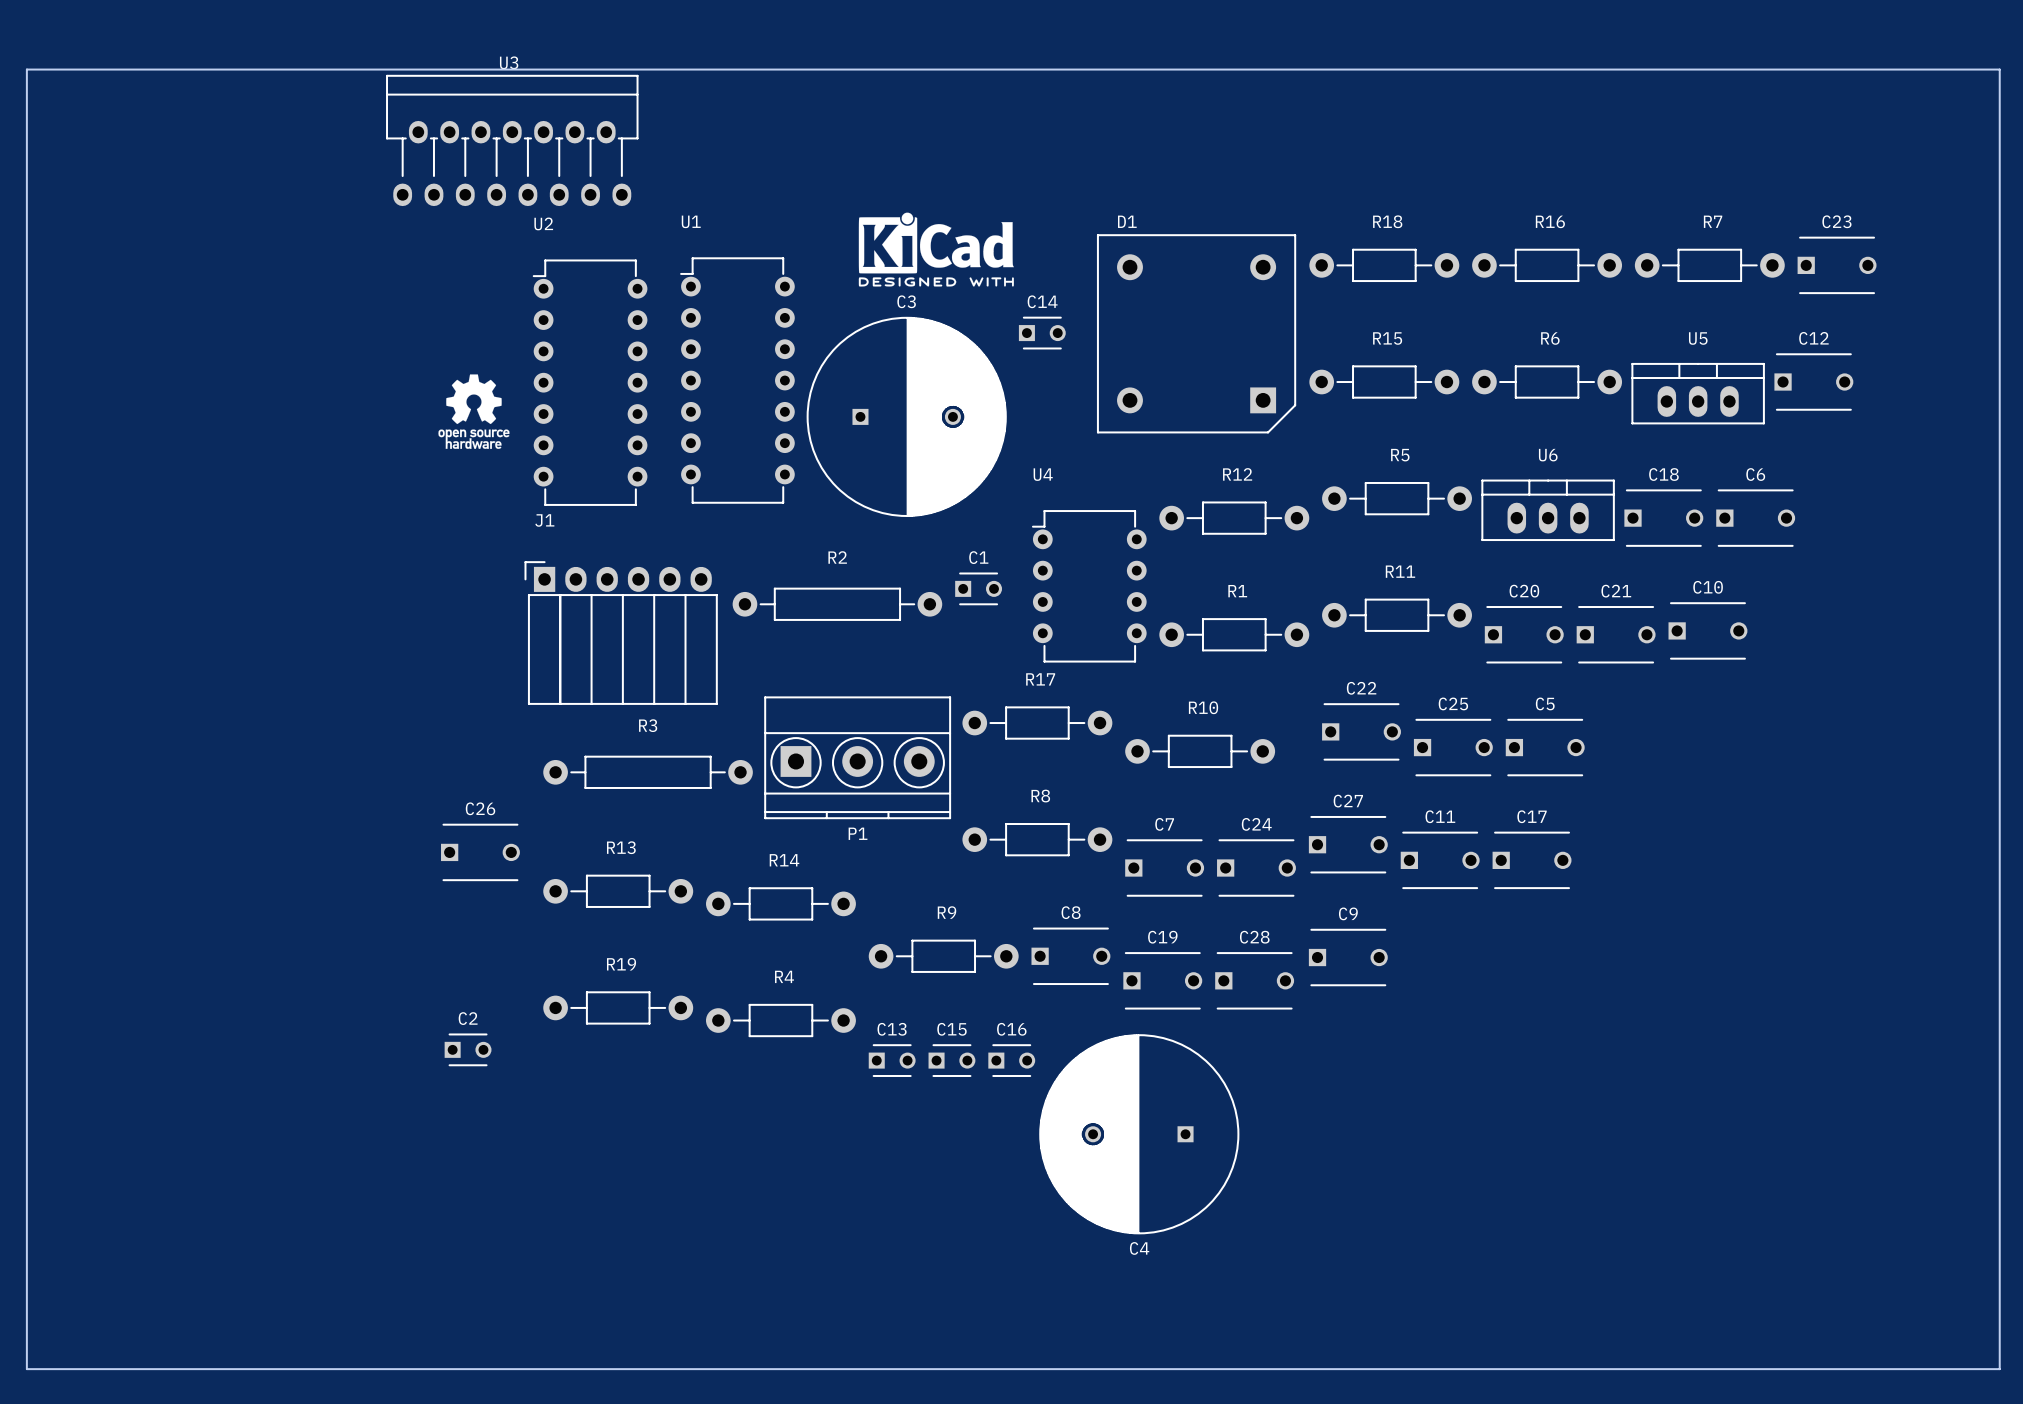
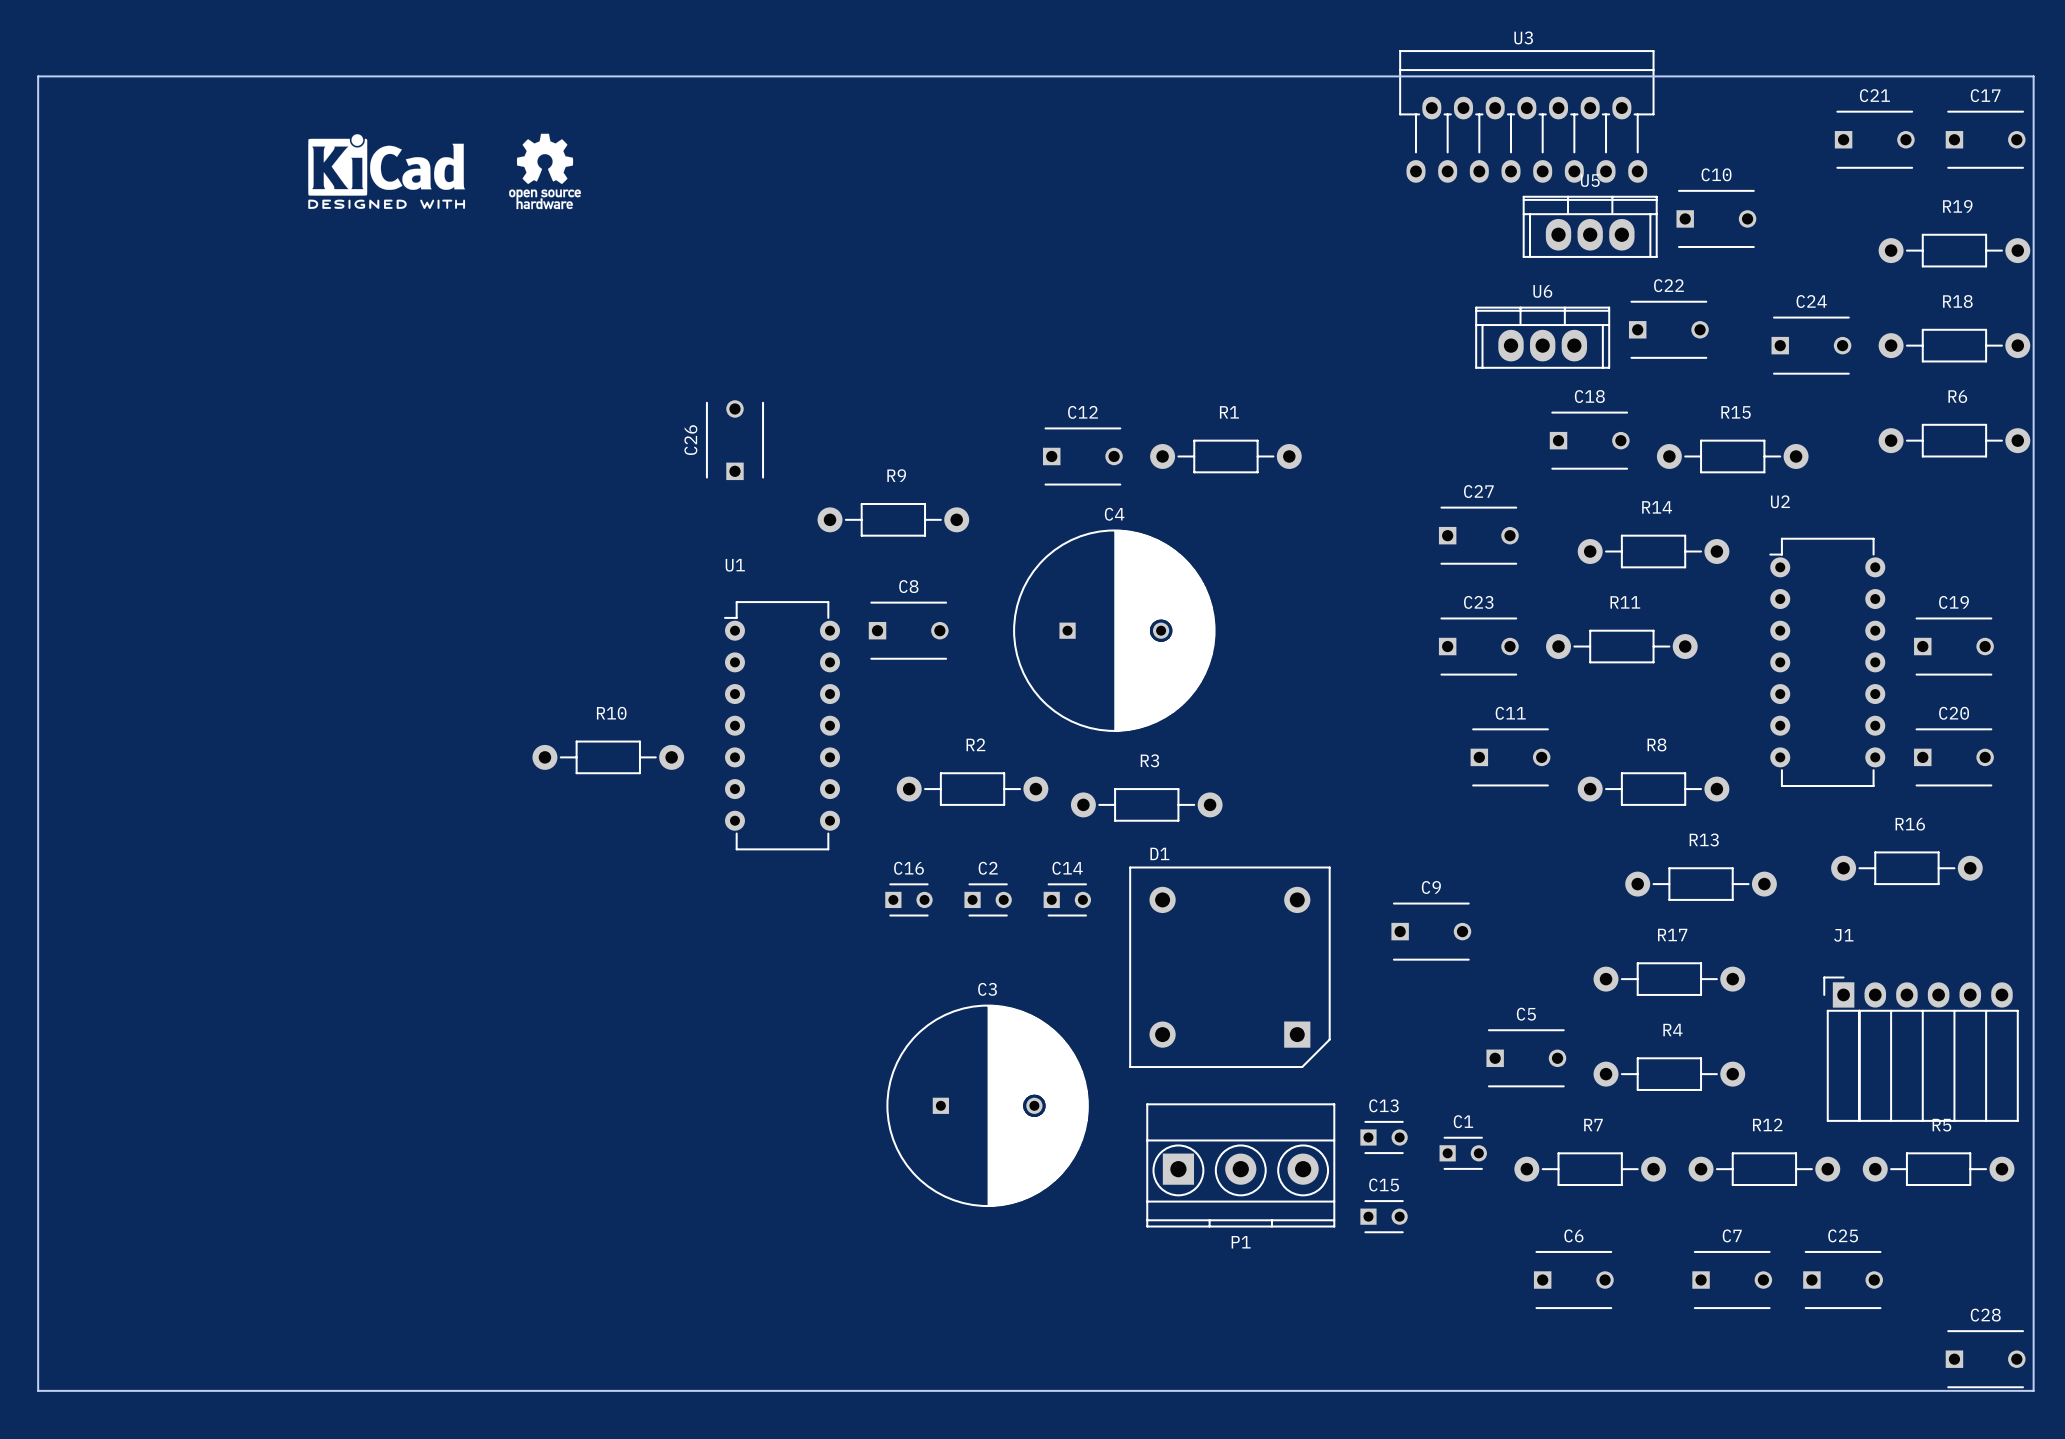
drawing: none -> [308, 134, 466, 209]
U3 position: (512, 140) -> (1526, 116)
drawing: [858, 212, 1014, 287] -> none
R18 position: (1384, 265) -> (1954, 345)
R16 position: (1547, 265) -> (1906, 868)
R7 position: (1709, 265) -> (1590, 1169)
C23 position: (1837, 265) -> (1478, 646)
C14 position: (1042, 333) -> (1067, 899)
D1 position: (1196, 333) -> (1229, 967)
U5 footprint: [1631, 362, 1765, 425] -> [1522, 195, 1658, 258]
U1 position: (737, 380) -> (782, 725)
U2 position: (590, 382) -> (1827, 662)
R15 position: (1384, 382) -> (1732, 456)
R6 position: (1547, 382) -> (1954, 440)
C12 position: (1813, 382) -> (1082, 456)
drawing position: (473, 411) -> (545, 171)
C3 position: (906, 416) -> (987, 1105)
U6 footprint: [1481, 479, 1615, 541] -> [1475, 306, 1611, 369]
R5 position: (1397, 498) -> (1938, 1169)
R12 position: (1234, 518) -> (1764, 1169)
C18 position: (1663, 518) -> (1589, 440)
C6 position: (1755, 518) -> (1573, 1280)
U4: (1089, 586) -> none
R2 footprint: [732, 587, 943, 621] -> [896, 772, 1049, 806]
C1 position: (978, 588) -> (1463, 1153)
R11 position: (1397, 615) -> (1621, 646)
C10 position: (1707, 630) -> (1716, 218)
J1 position: (621, 633) -> (1921, 1049)
R1 position: (1234, 634) -> (1225, 456)
C20 position: (1524, 634) -> (1953, 757)
C21 position: (1616, 634) -> (1874, 139)
R17 position: (1037, 723) -> (1669, 979)
C22 position: (1361, 731) -> (1668, 329)
C25 position: (1453, 747) -> (1843, 1280)
C5 position: (1545, 747) -> (1526, 1058)
R10 position: (1200, 751) -> (608, 757)
R3 footprint: [543, 755, 753, 789] -> [1070, 788, 1223, 822]
P1 position: (857, 757) -> (1240, 1165)
R8 position: (1037, 839) -> (1653, 789)
C27 position: (1348, 844) -> (1478, 535)
C26 rotation: 0° (480, 852) -> 90° counterclockwise (734, 440)
C26 position: (480, 852) -> (734, 440)
C11 position: (1440, 860) -> (1510, 757)
C17 position: (1532, 860) -> (1985, 139)
C7 position: (1164, 868) -> (1732, 1280)
C24 position: (1256, 868) -> (1811, 345)
R13 position: (618, 891) -> (1701, 884)
R14 position: (780, 903) -> (1653, 551)
R9 position: (943, 956) -> (893, 519)
C8 position: (1070, 956) -> (908, 630)
C9 position: (1348, 957) -> (1431, 931)
C19 position: (1162, 980) -> (1953, 646)
C28 position: (1254, 980) -> (1985, 1359)
R19 position: (618, 1007) -> (1954, 250)
R4 position: (780, 1020) -> (1669, 1074)
C2 position: (468, 1049) -> (988, 899)
C13 position: (892, 1060) -> (1384, 1137)
C15 position: (951, 1060) -> (1384, 1216)
C16 position: (1011, 1060) -> (908, 899)
C4 rotation: 0° (1139, 1134) -> 180° (1114, 630)
C4 position: (1139, 1134) -> (1114, 630)

